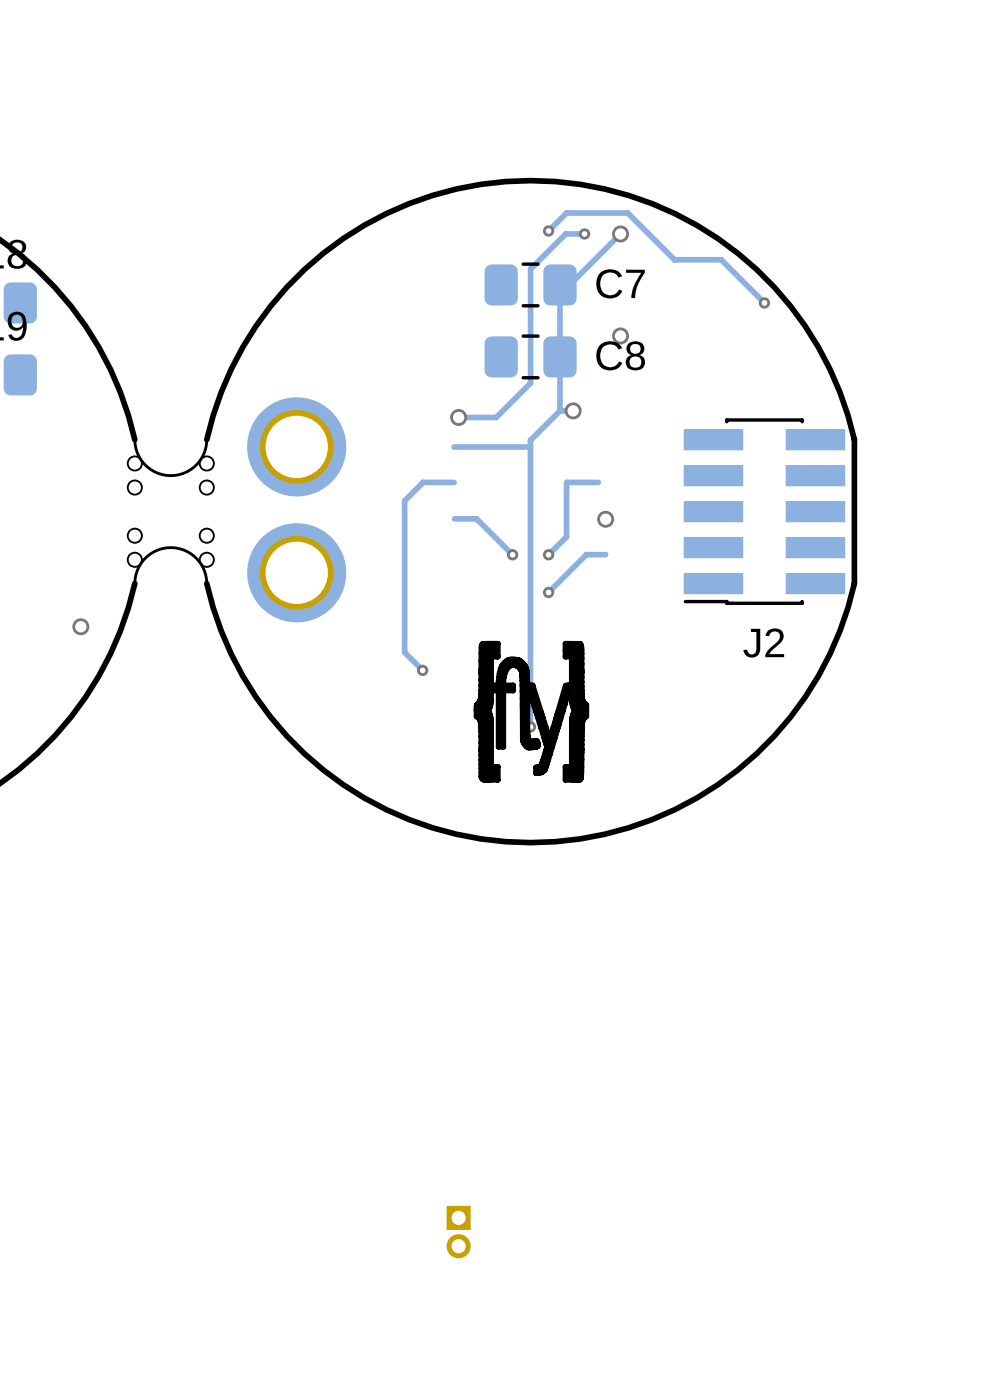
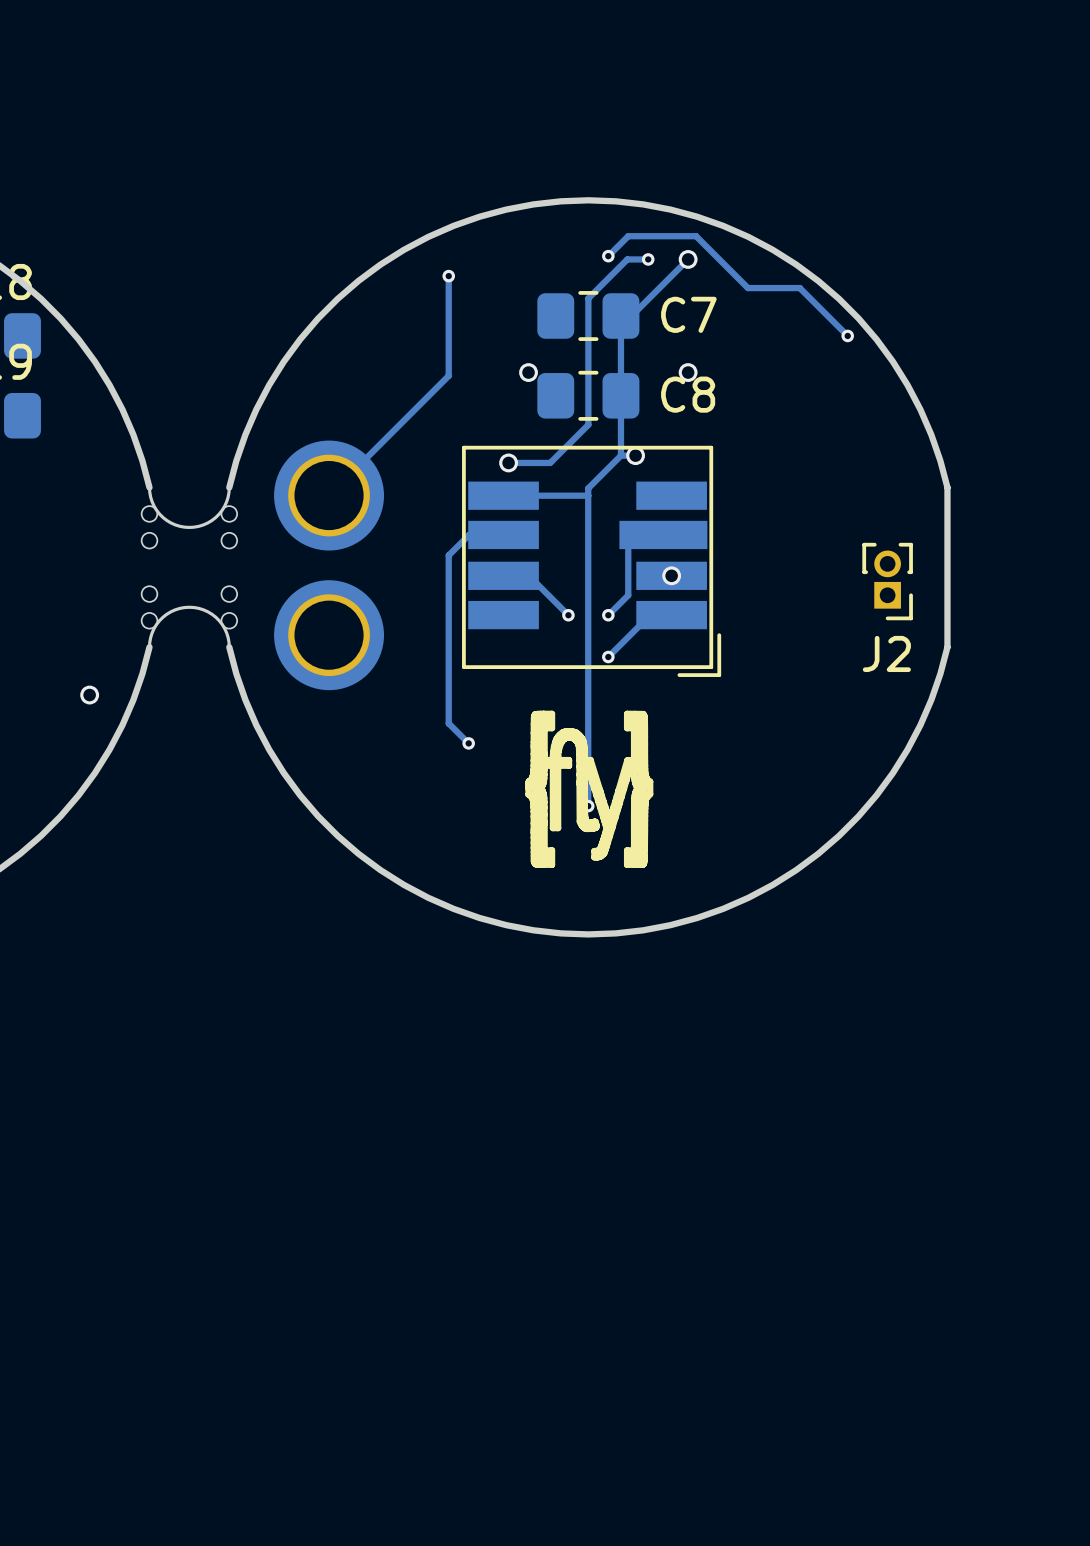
track: none -> (448, 276) (448, 375) (329, 495)
via: none -> (448, 276)
via: none -> (528, 372)
J2 footprint: [683, 418, 846, 605] -> [862, 542, 913, 621]
part: none -> (591, 561)
J2 name position: J2 (763, 643) -> J2 (886, 653)
part: (458, 1232) -> none

